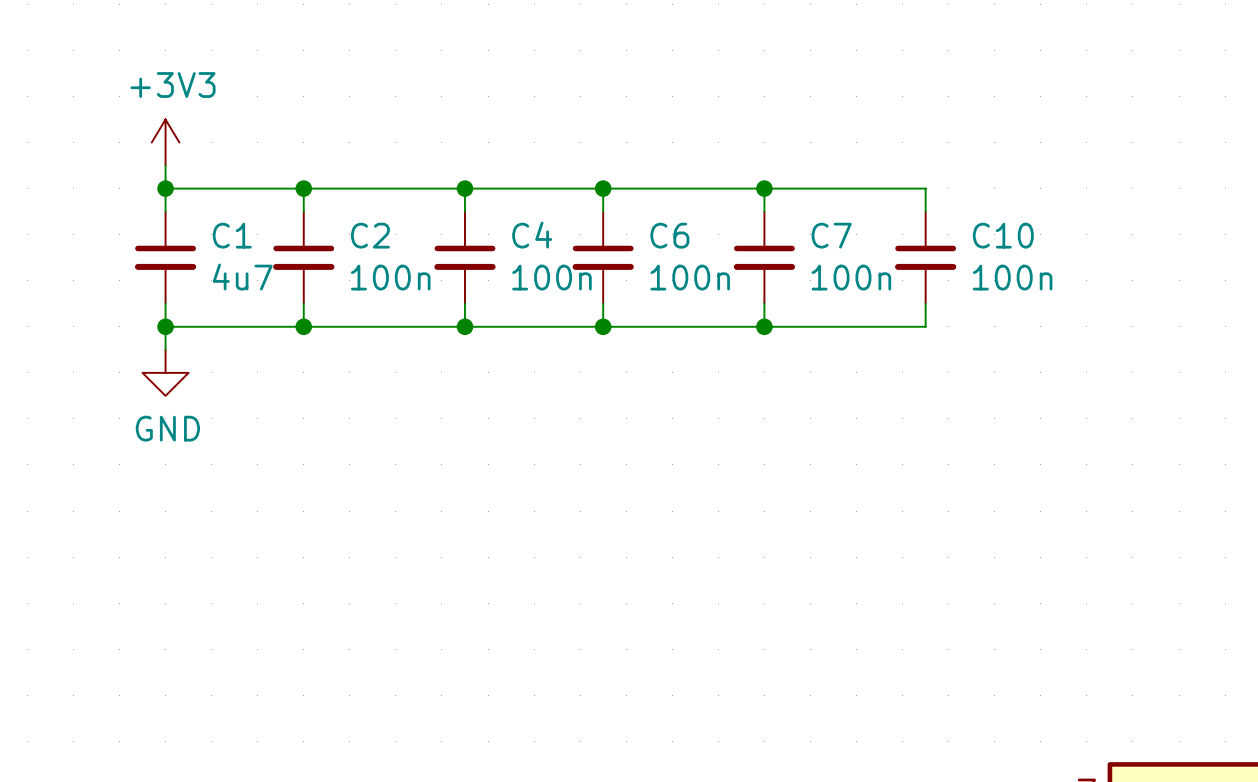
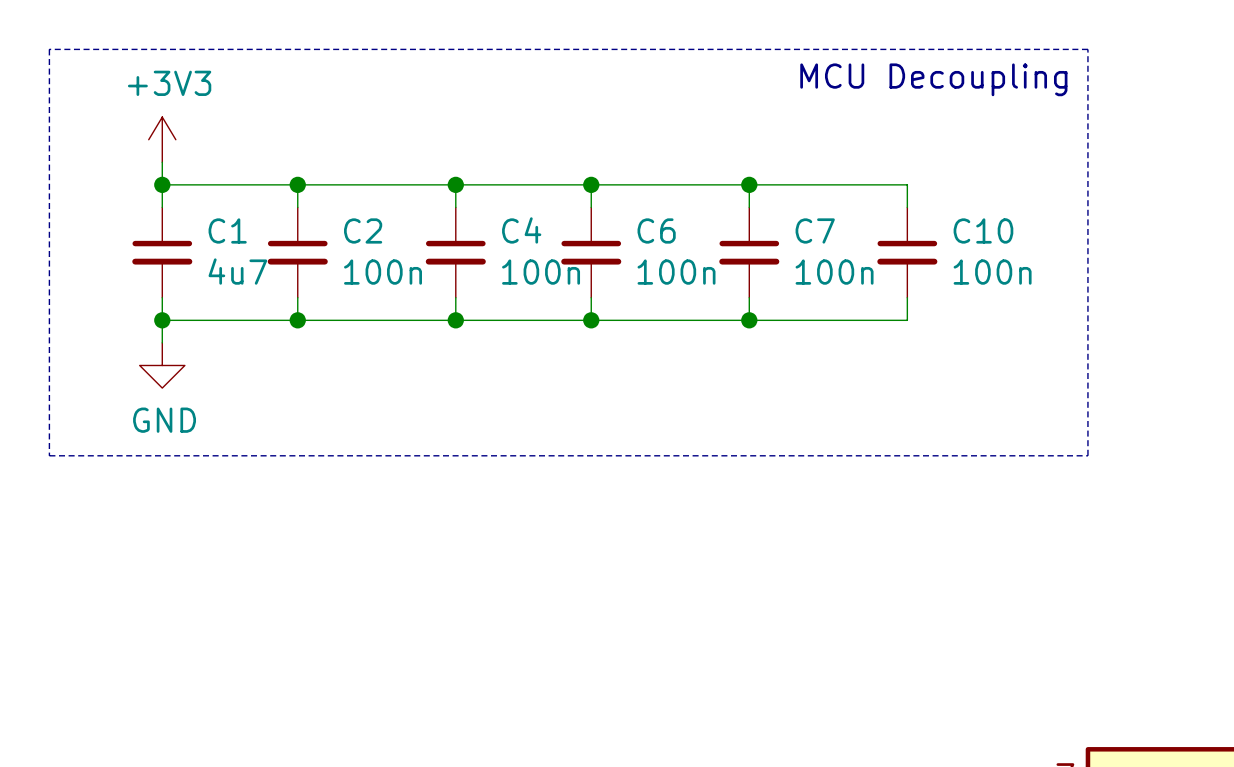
line: none -> (49, 49) (49, 455) (1087, 455) (1087, 49) (49, 49)
text: none -> MCU Decoupling (933, 79)

